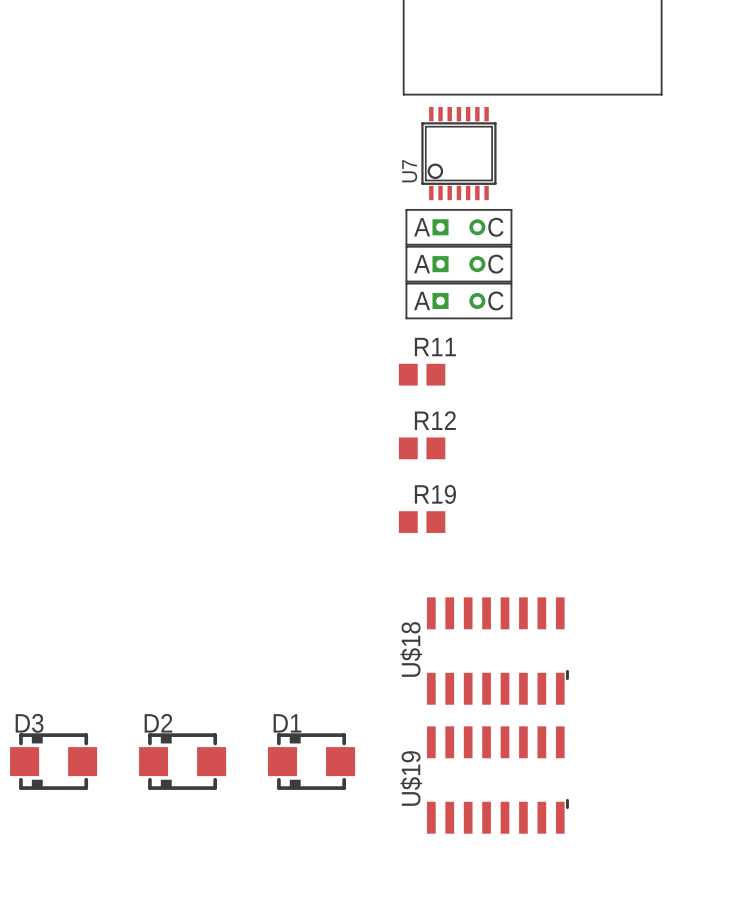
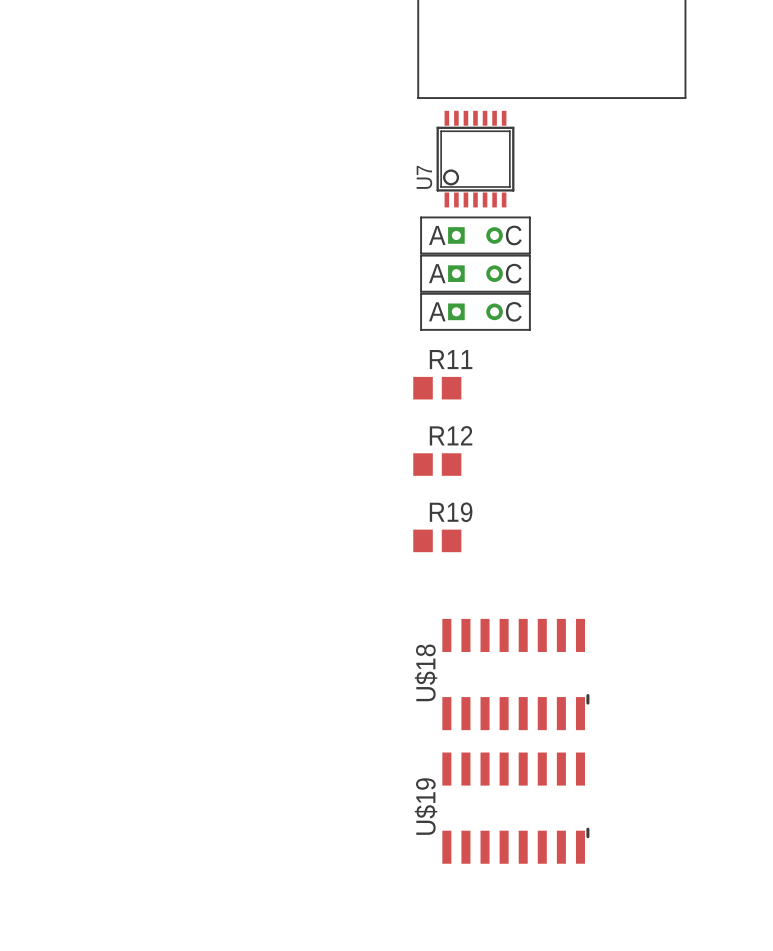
D3: (53, 761) -> none
D2: (182, 761) -> none
D1: (311, 761) -> none

